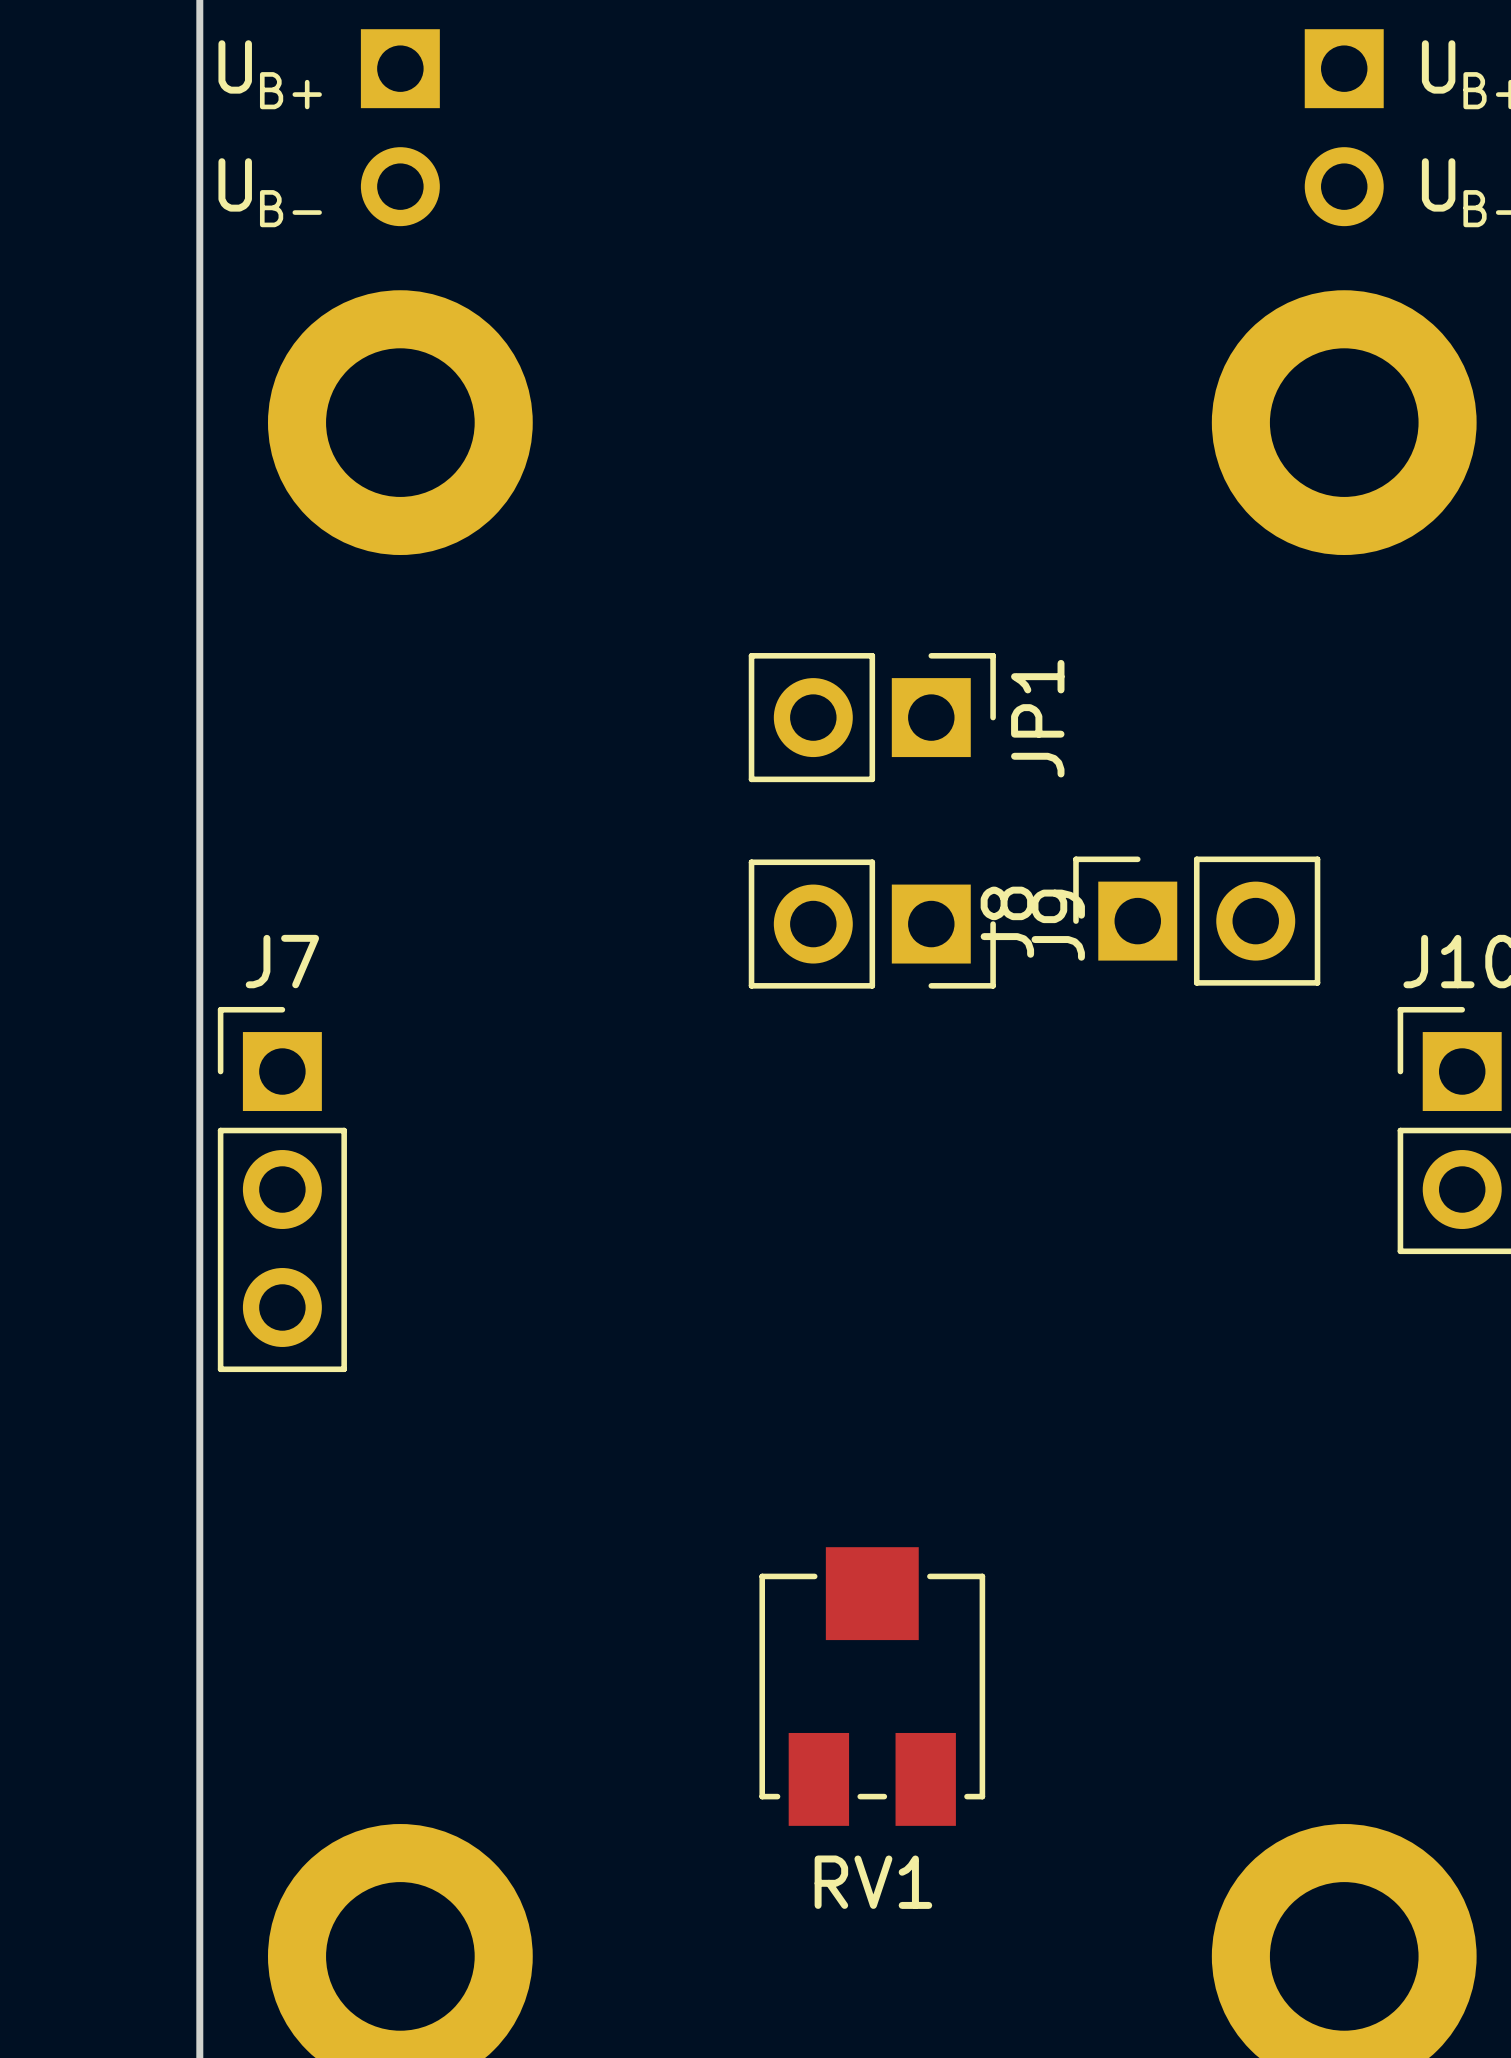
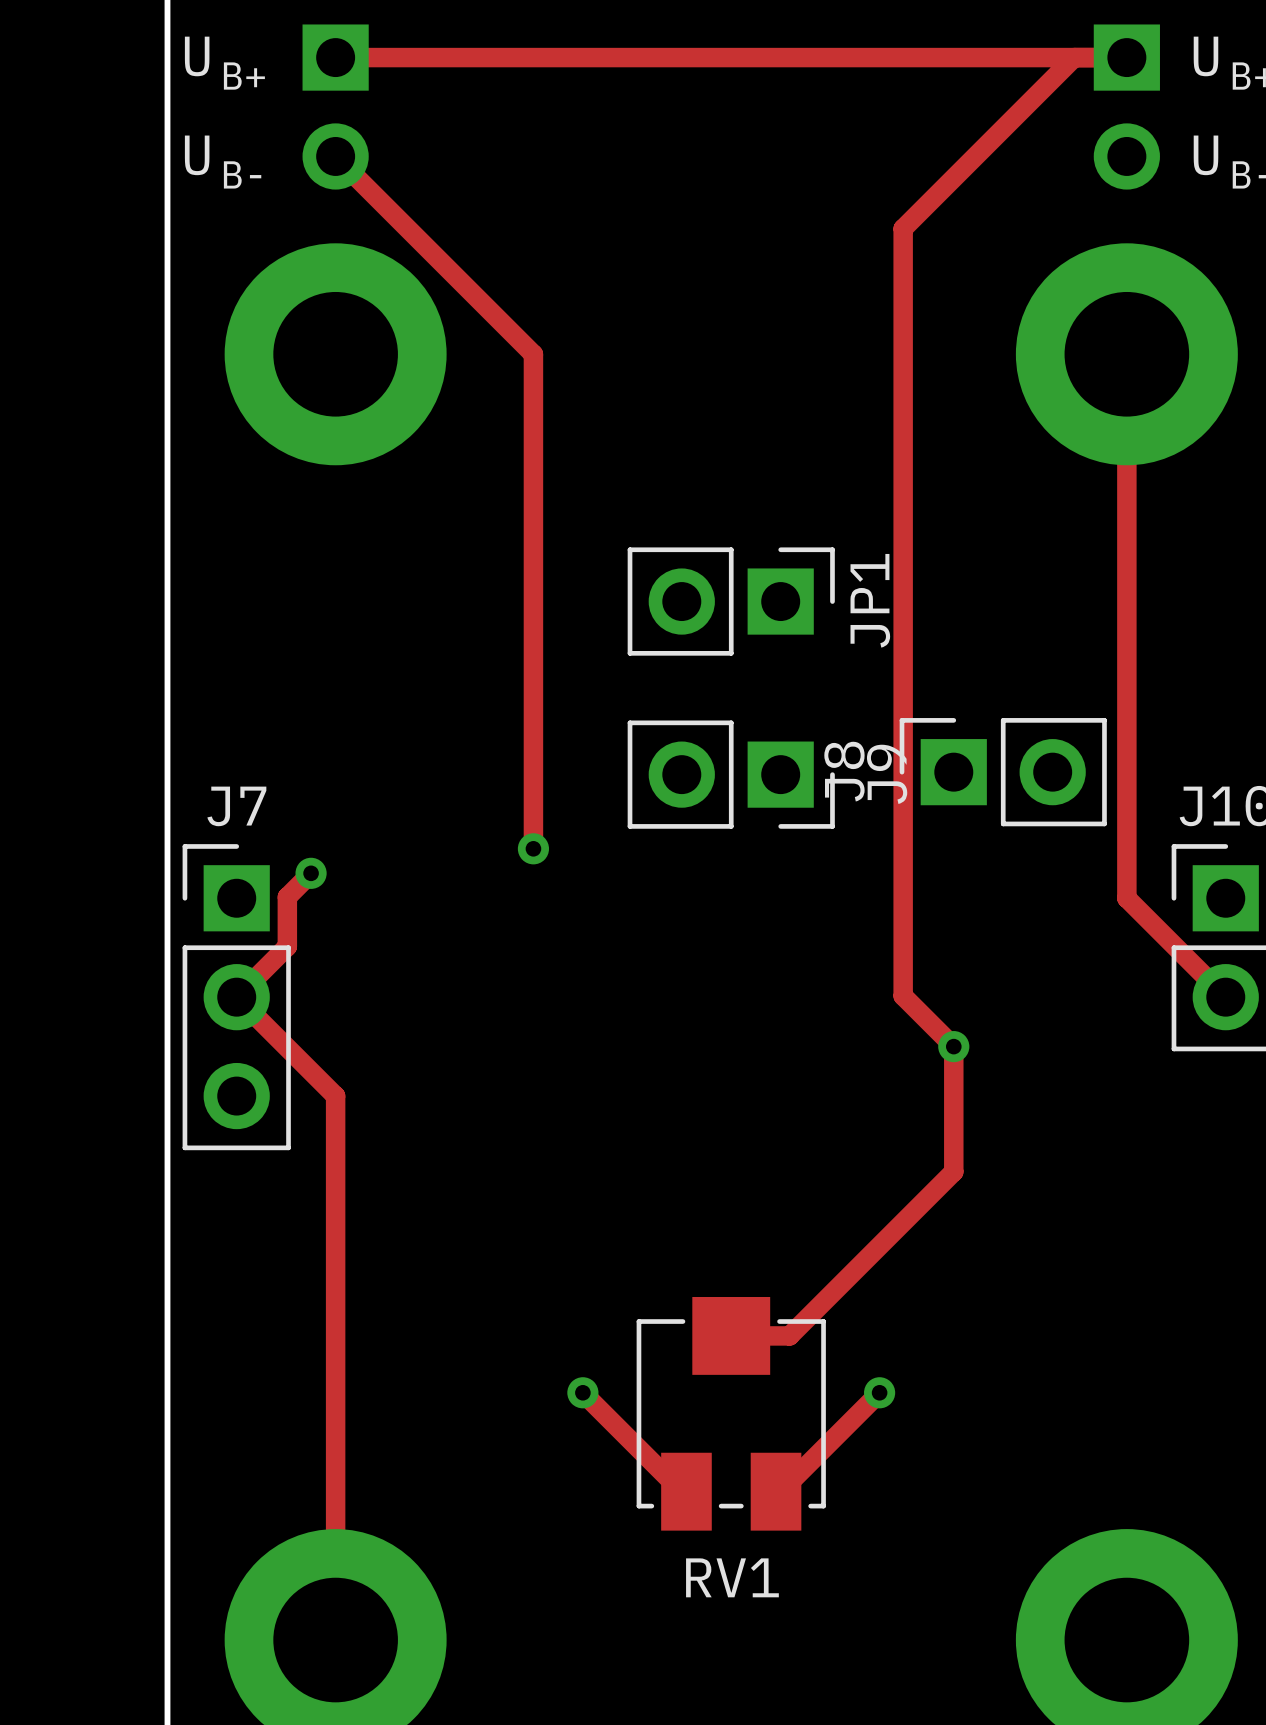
track: none -> (335, 57) (1126, 57)
track: none -> (1074, 57) (903, 228) (903, 995) (953, 1046) (953, 1171) (789, 1335) (731, 1335)
track: none -> (335, 156) (533, 354) (533, 848)
track: none -> (1126, 354) (1126, 898) (1225, 997)
via: none -> (533, 848)
track: none -> (311, 873) (287, 897) (287, 946) (236, 997) (335, 1096) (335, 1640)
via: none -> (311, 873)
via: none -> (953, 1046)
track: none -> (582, 1392) (681, 1491) (686, 1491)
via: none -> (582, 1392)
track: none -> (879, 1392) (780, 1491) (776, 1491)
via: none -> (879, 1392)

